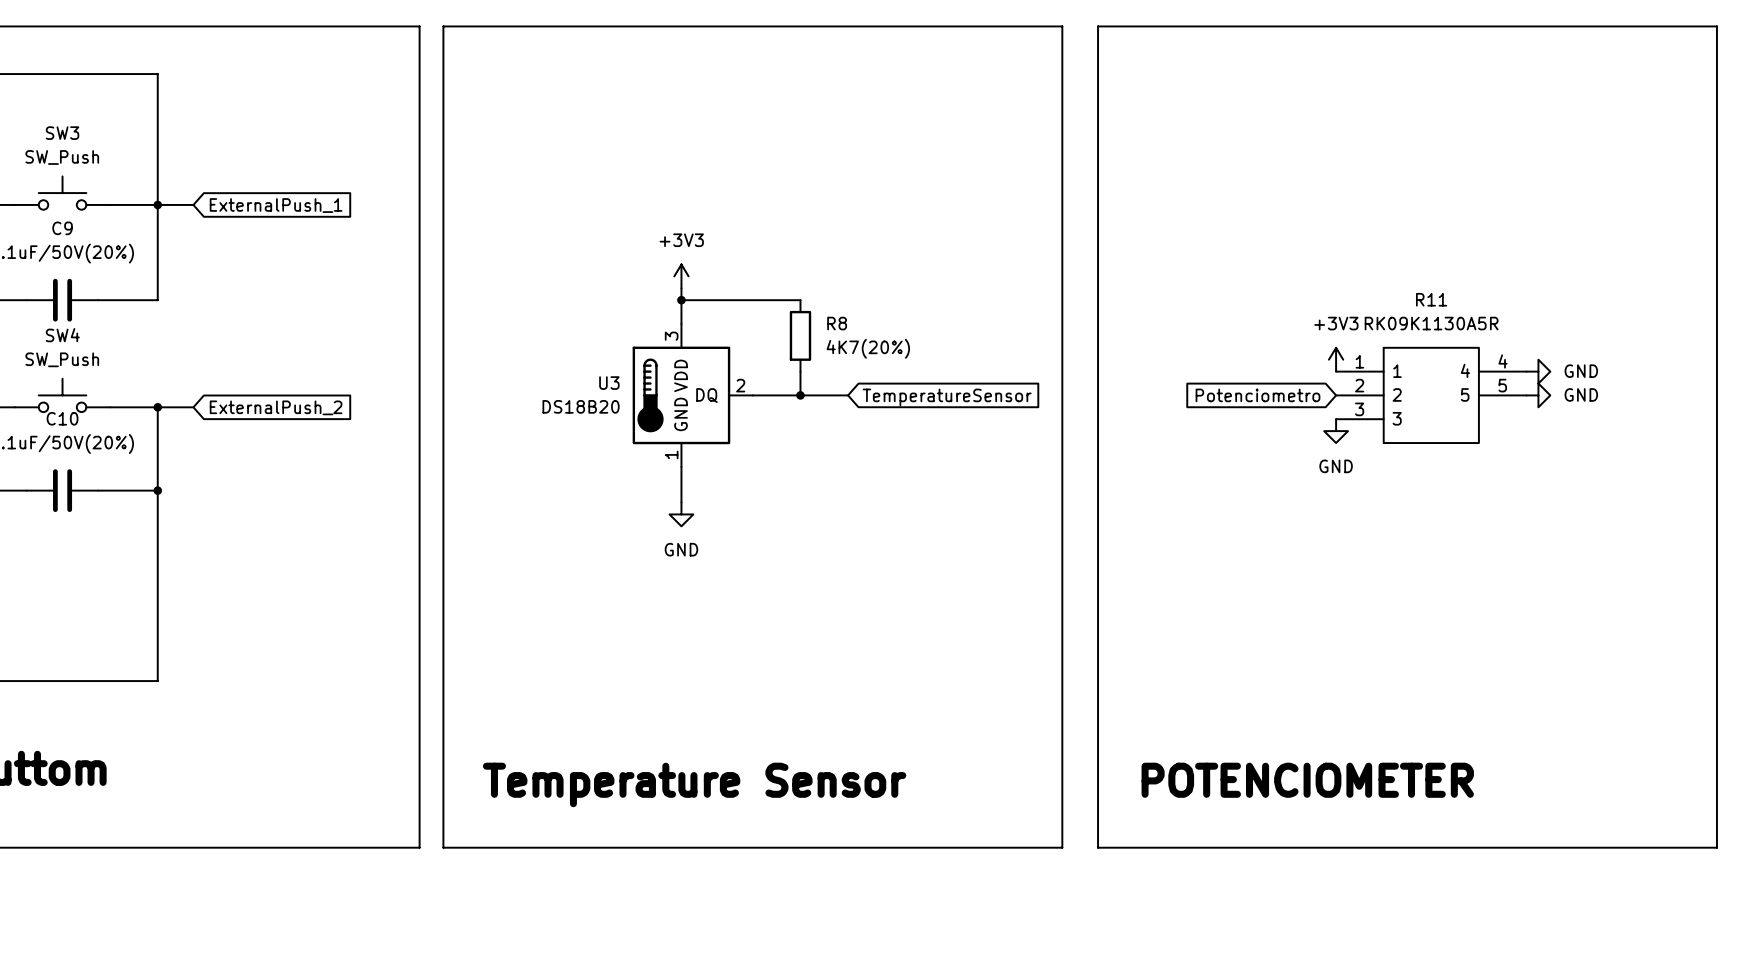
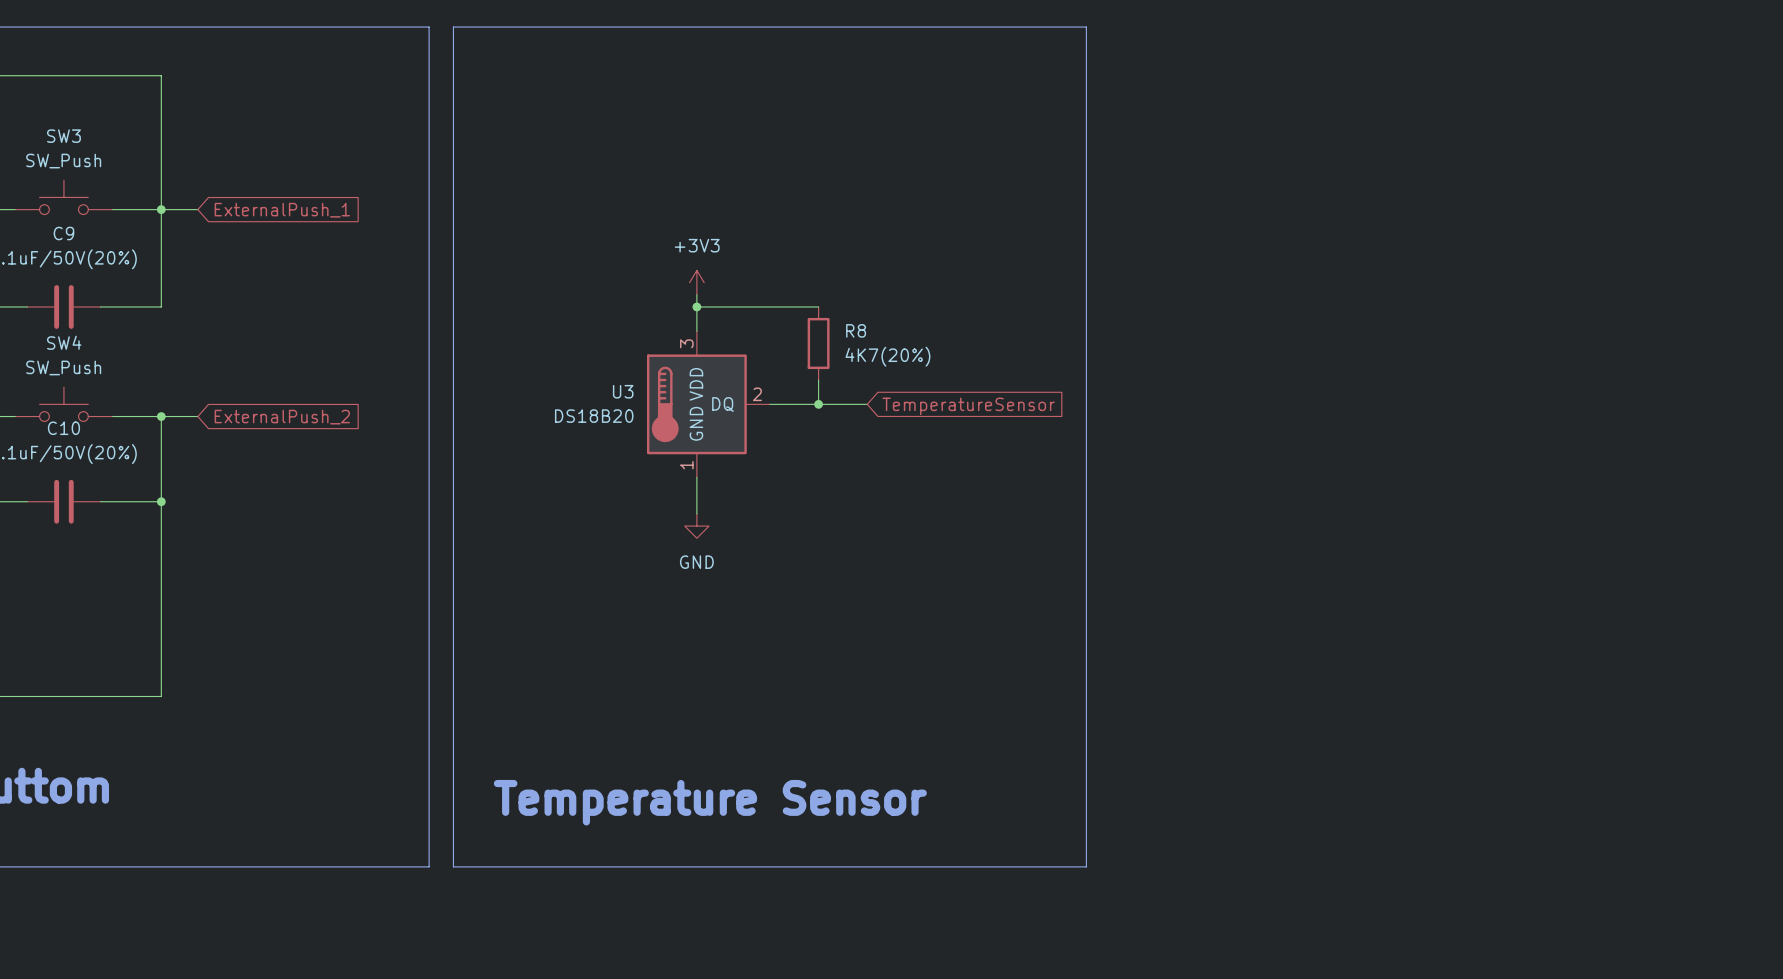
line: (1098, 26) (1098, 847) (1716, 847) (1716, 26) (1098, 26) -> none
power symbol: +3V3 (1336, 359) -> none
power symbol: GND (1538, 371) -> none
global label: Potenciometro (1258, 395) -> none
R11: RK09K1130A5R (1431, 395) -> none
power symbol: GND (1538, 395) -> none
power symbol: GND (1336, 431) -> none
text: POTENCIOMETER (1307, 780) -> none

